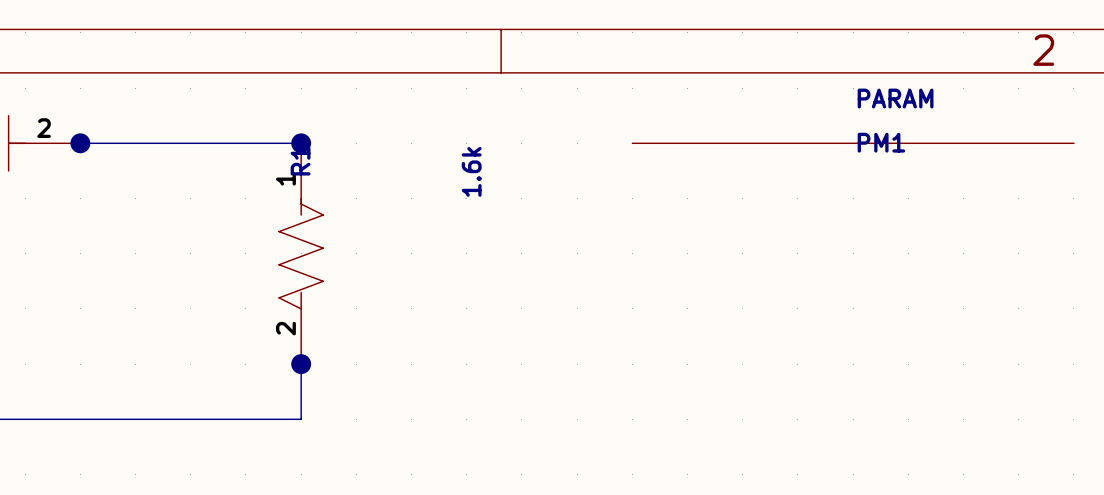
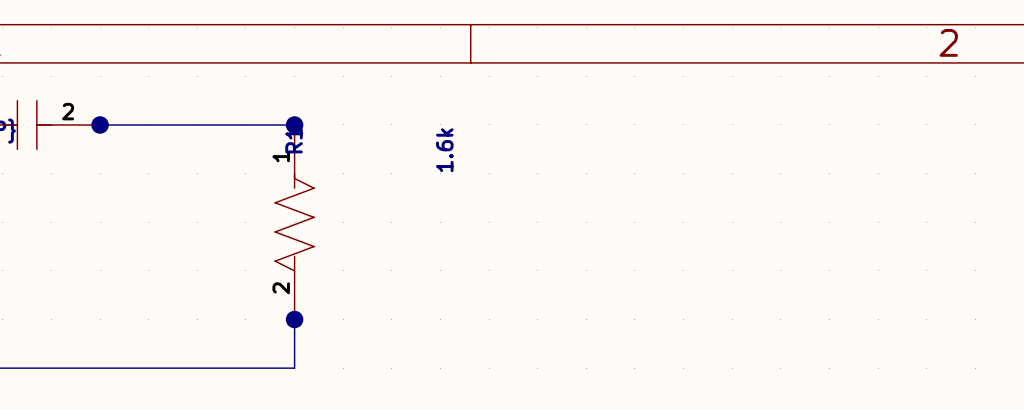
PM1: PARAM (853, 143) -> none

